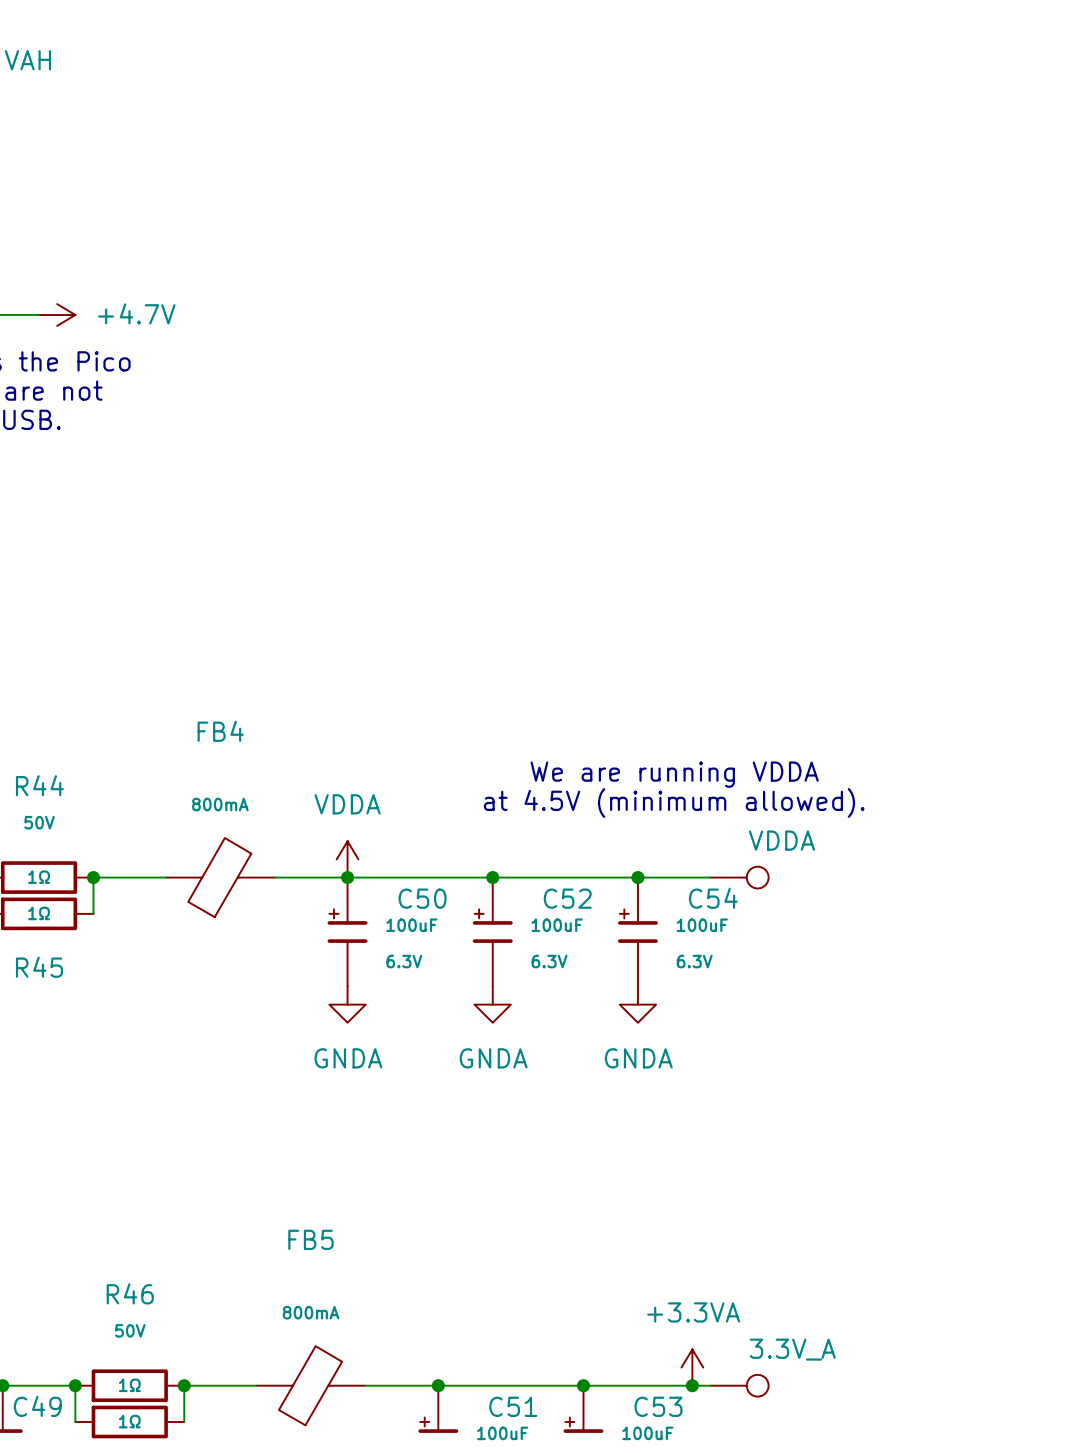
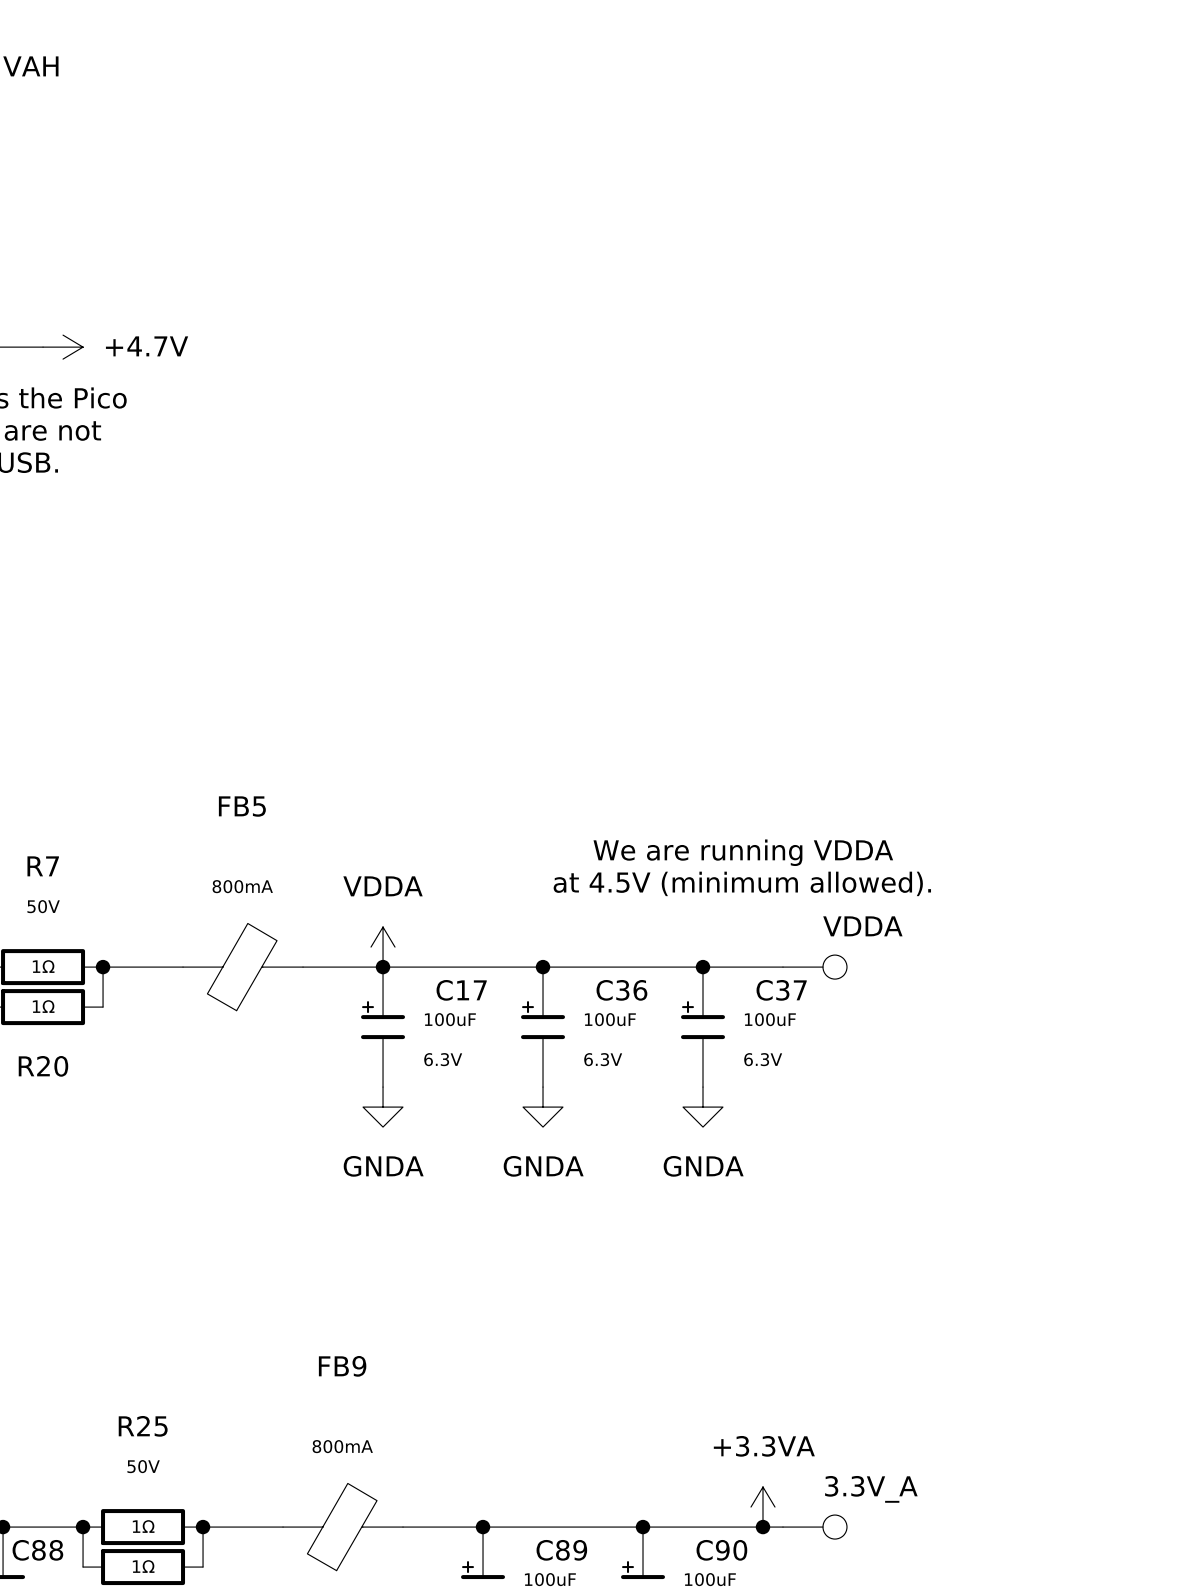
FB4 name: FB4 (220, 731) -> FB5 (242, 806)
R44 name: R44 (39, 785) -> R7 (43, 866)
C50 name: C50 (422, 898) -> C17 (461, 990)
C52 name: C52 (567, 898) -> C36 (621, 990)
C54 name: C54 (713, 898) -> C37 (781, 990)
R45 name: R45 (39, 967) -> R20 (43, 1066)
FB5 name: FB5 (310, 1239) -> FB9 (342, 1366)
R46 name: R46 (130, 1293) -> R25 (143, 1426)
C49 name: C49 (37, 1406) -> C88 (37, 1550)
C51 name: C51 (513, 1406) -> C89 (561, 1550)
C53 name: C53 (658, 1406) -> C90 (721, 1550)

